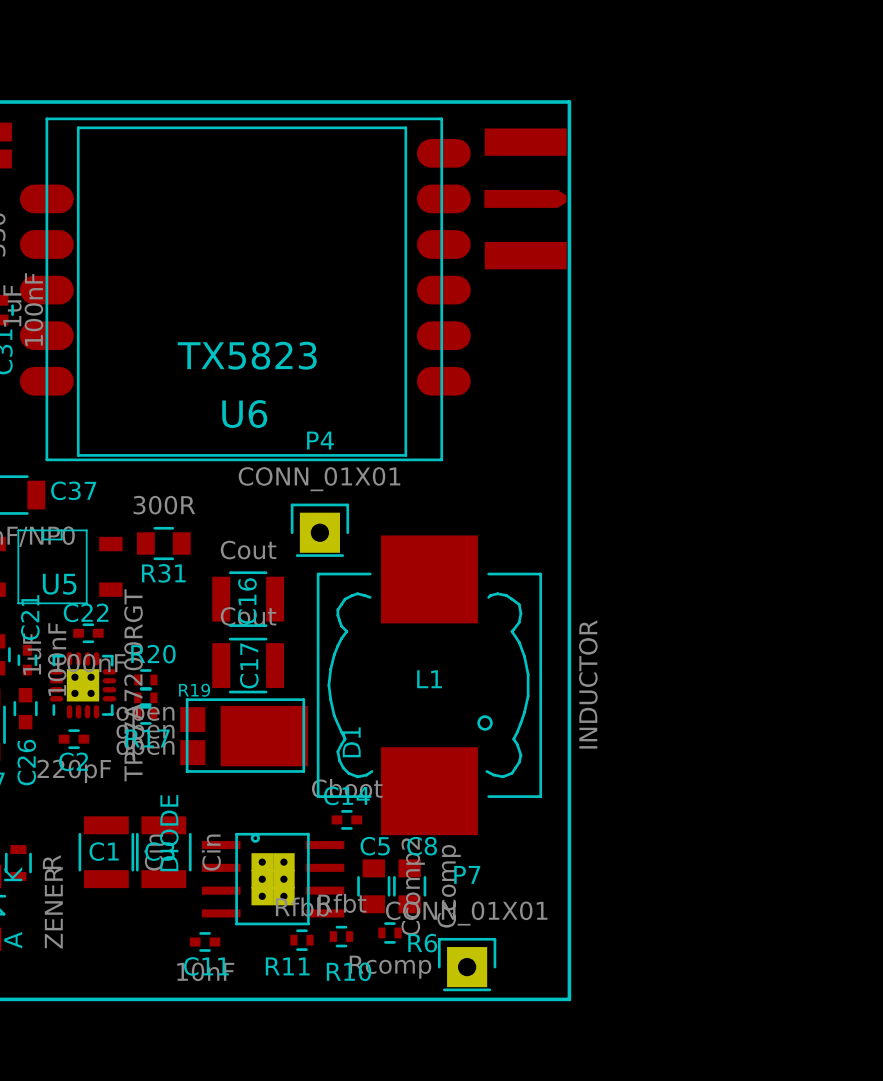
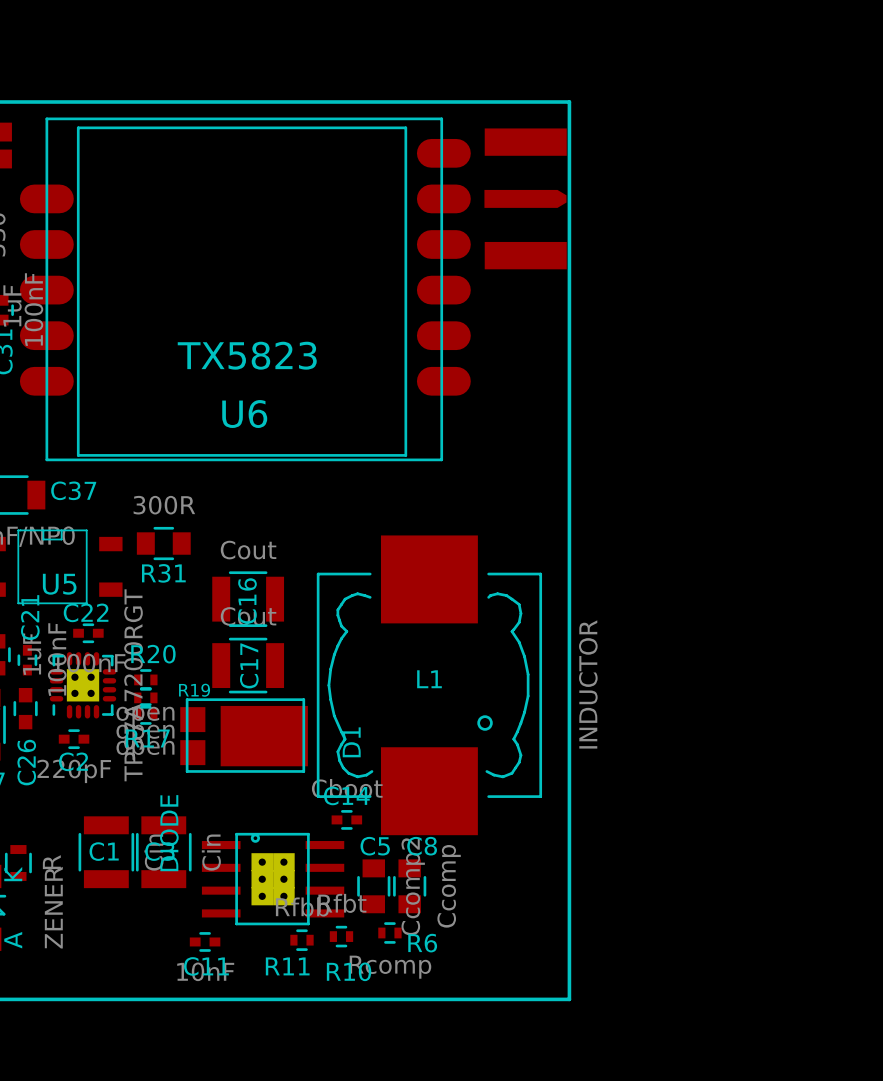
P4: CONN_01X01 (319, 530) -> none
P7: CONN_01X01 (467, 964) -> none

